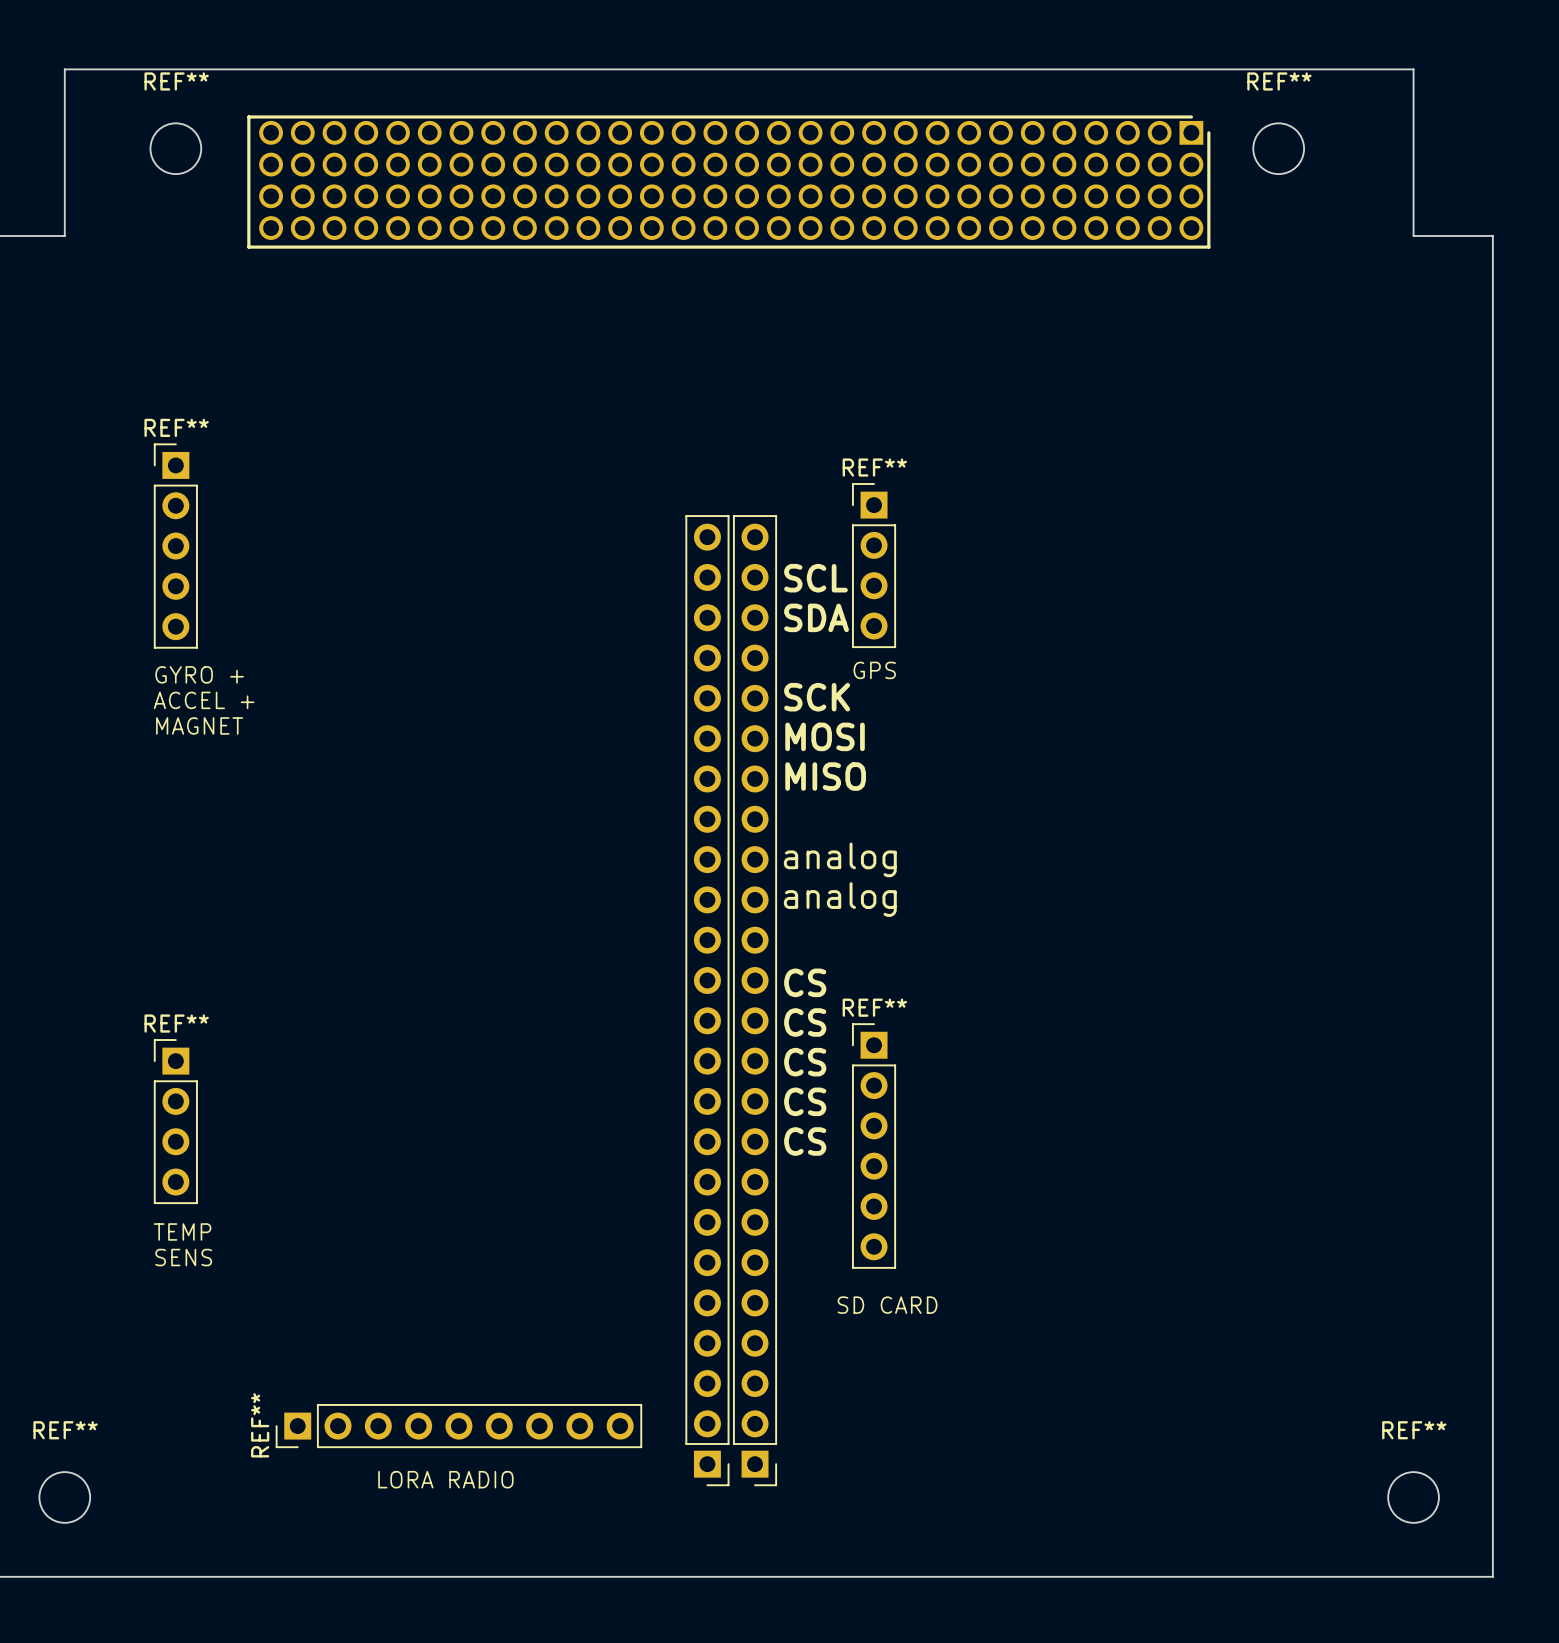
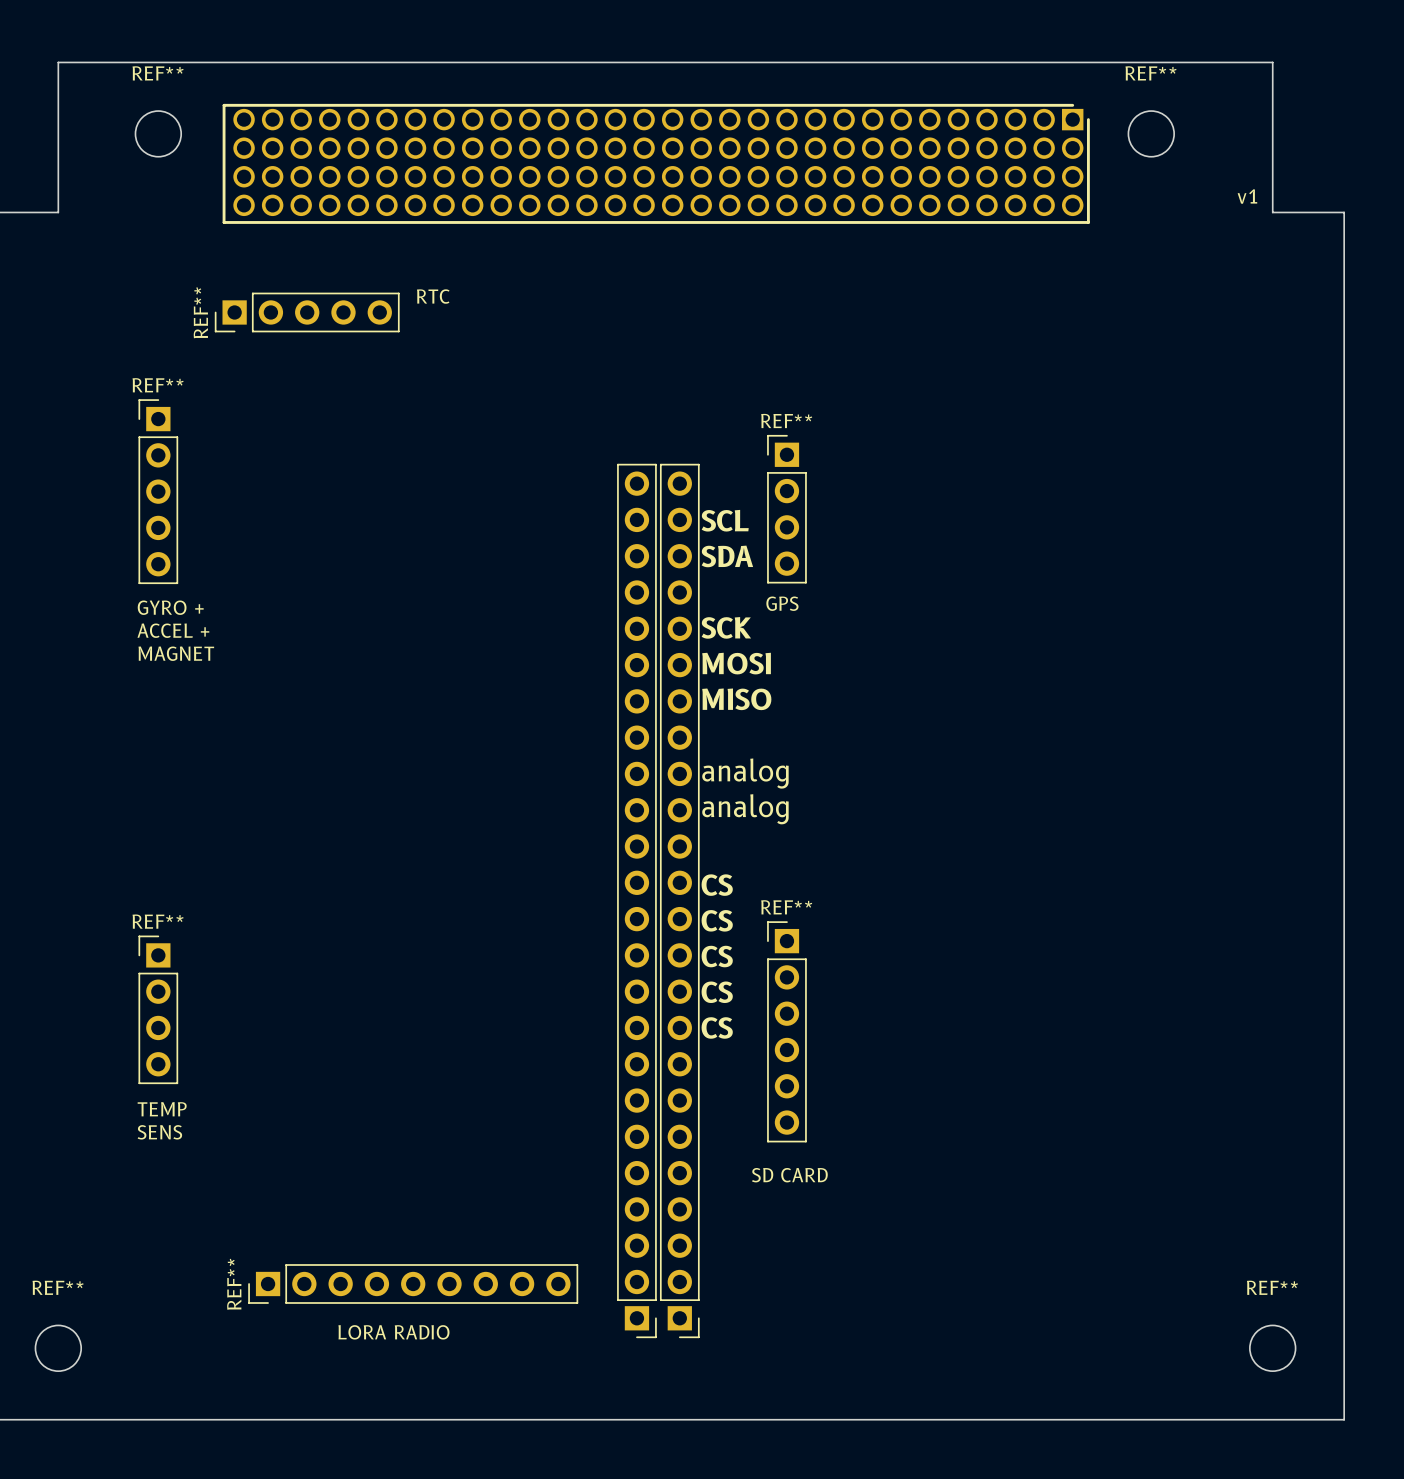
text: none -> v1 (1247, 196)
text: none -> RTC (433, 296)
REF**: none -> (307, 312)

